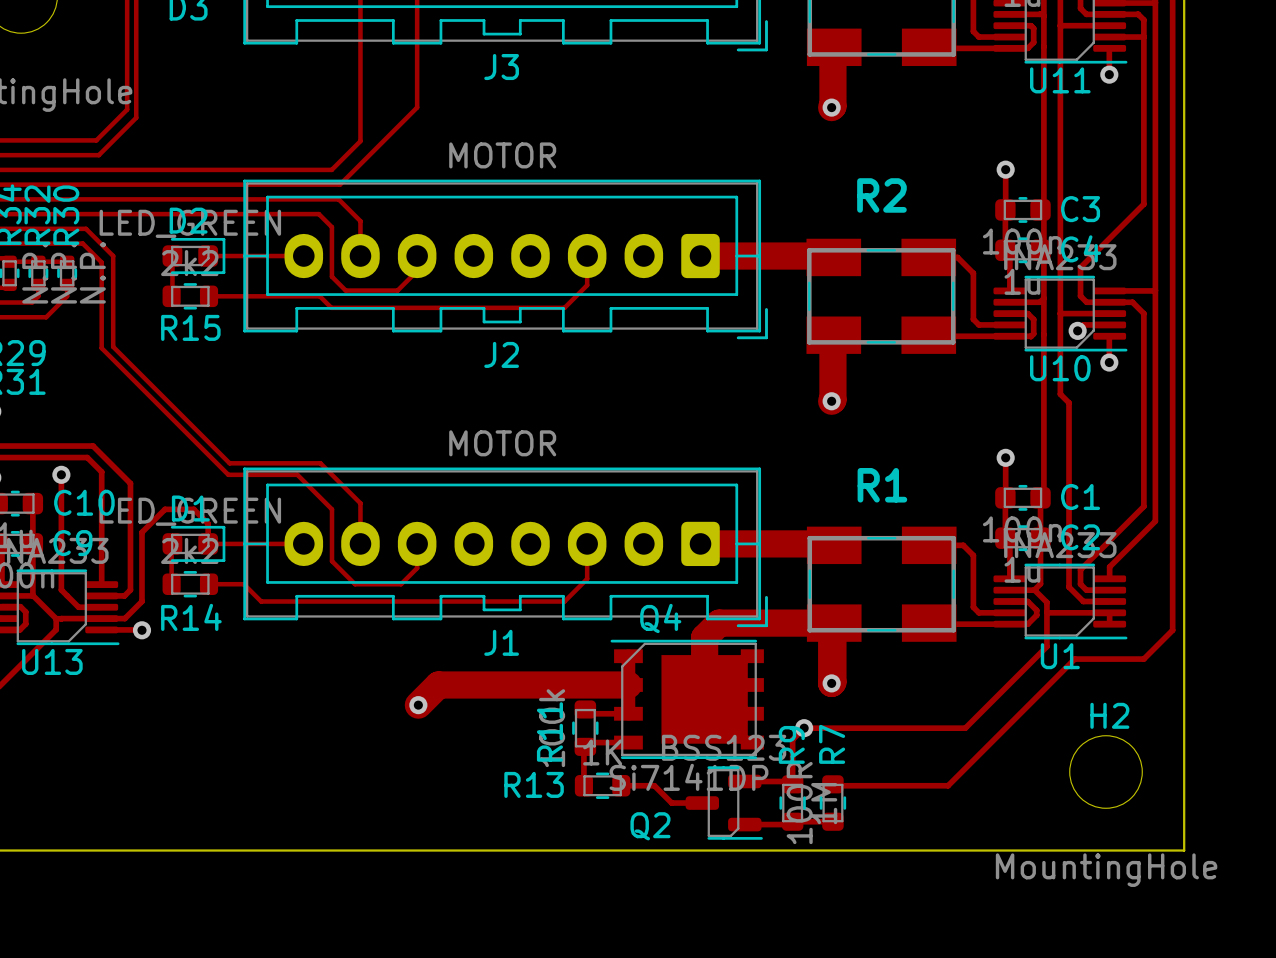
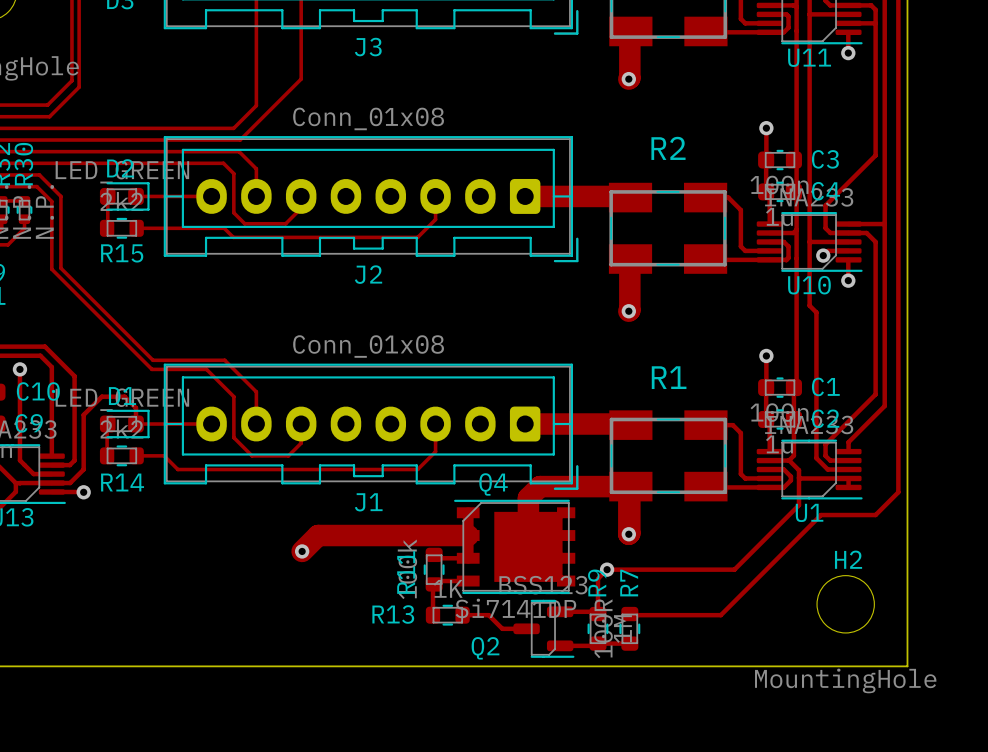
J2 value: MOTOR (502, 155) -> Conn_01x08 (368, 118)
J1 value: MOTOR (502, 443) -> Conn_01x08 (368, 346)

